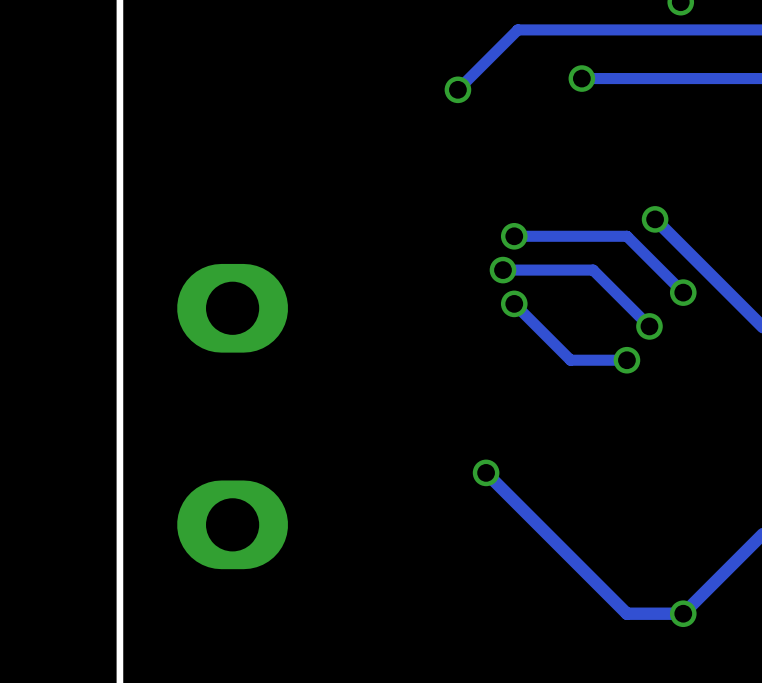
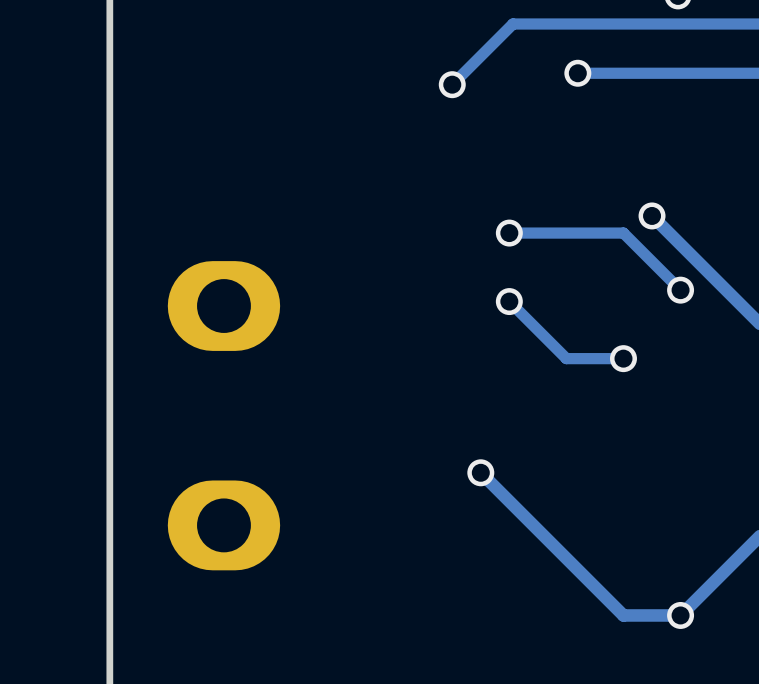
track: (503, 270) (593, 270) (649, 326) -> none
via: (503, 270) -> none
via: (649, 326) -> none

